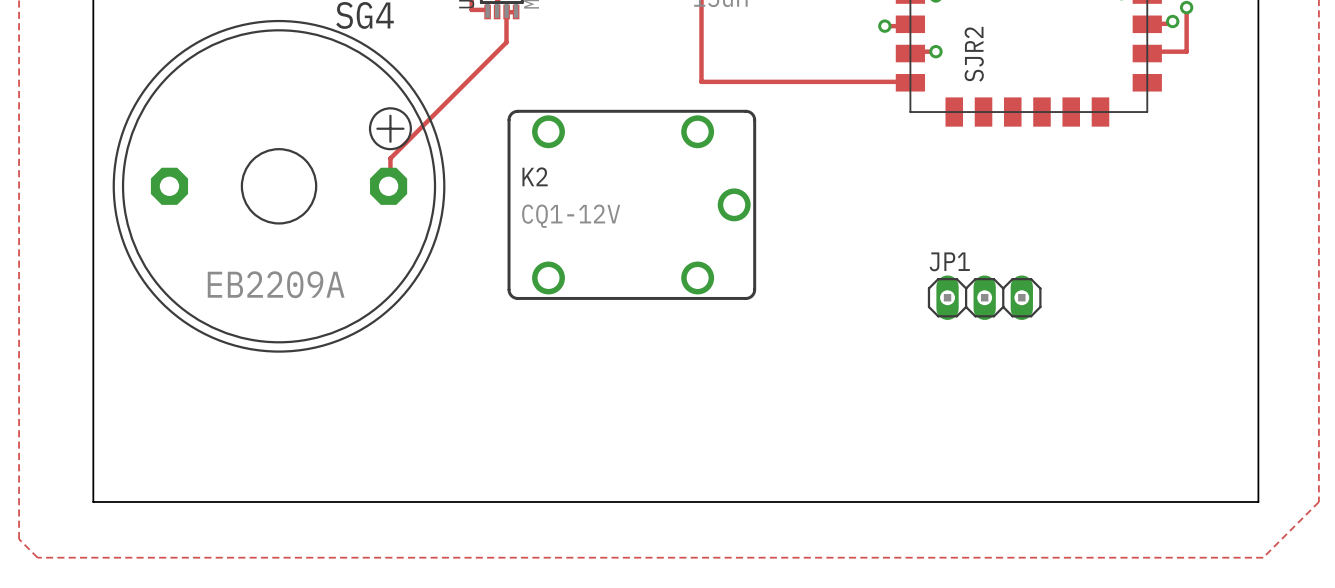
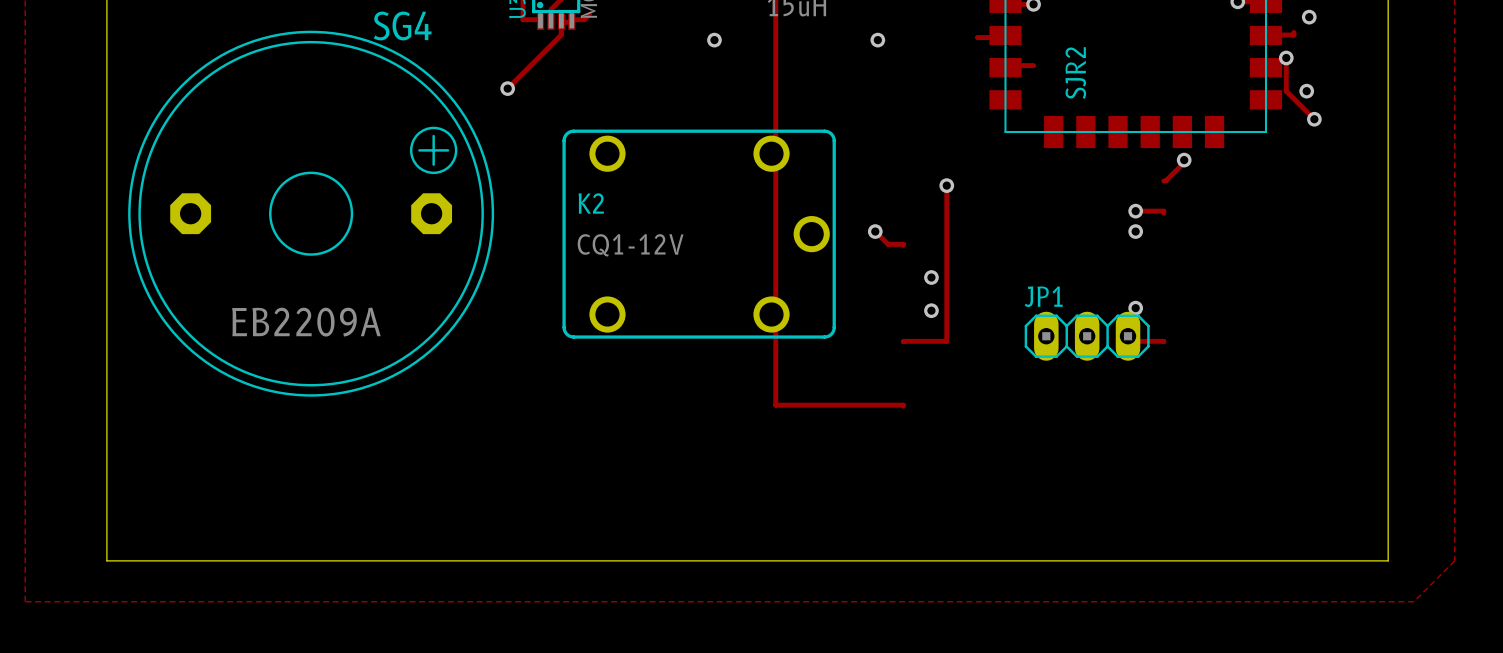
track: none -> (589, 14) (584, 19) (574, 19) (571, 22)
track: (1186, 7) (1186, 51) (1149, 51) (1147, 53) -> none
via position: (1172, 21) -> (1286, 57)
track: (506, 23) (506, 42) (390, 158) (390, 186) (388, 186) -> (561, 35) (507, 88)
via: (884, 26) -> none
via: none -> (714, 40)
via: none -> (877, 40)
track: none -> (1286, 57) (1286, 91) (1314, 119)
via: (935, 51) -> none
via: none -> (507, 88)
via: none -> (1306, 91)
track: (701, 81) (910, 82) -> (775, 98) (775, 405) (903, 406)
via: none -> (1314, 119)
track: none -> (1184, 160) (1184, 162) (1163, 181)
via: none -> (1184, 160)
track: none -> (946, 185) (946, 341) (903, 341)
via: none -> (946, 185)
track: none -> (1135, 211) (1163, 211) (1163, 213)
via: none -> (1135, 211)
track: none -> (875, 231) (888, 244) (903, 245)
via: none -> (875, 231)
via: none -> (1135, 231)
via: none -> (931, 277)
via: none -> (1135, 308)
via: none -> (931, 310)
track: none -> (1135, 341) (1163, 341)
zone outline: (19, 539) (37, 557) (1263, 557) (1281, 539) -> (25, 601) (1413, 601)

